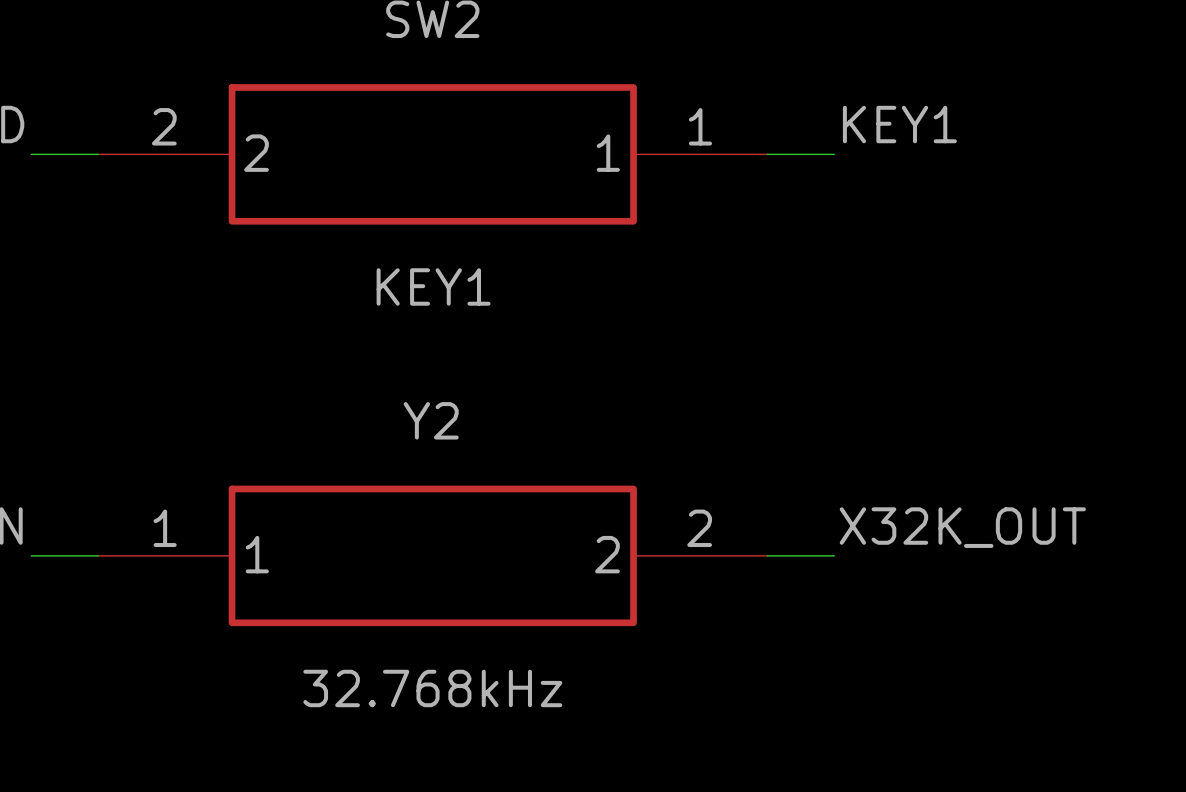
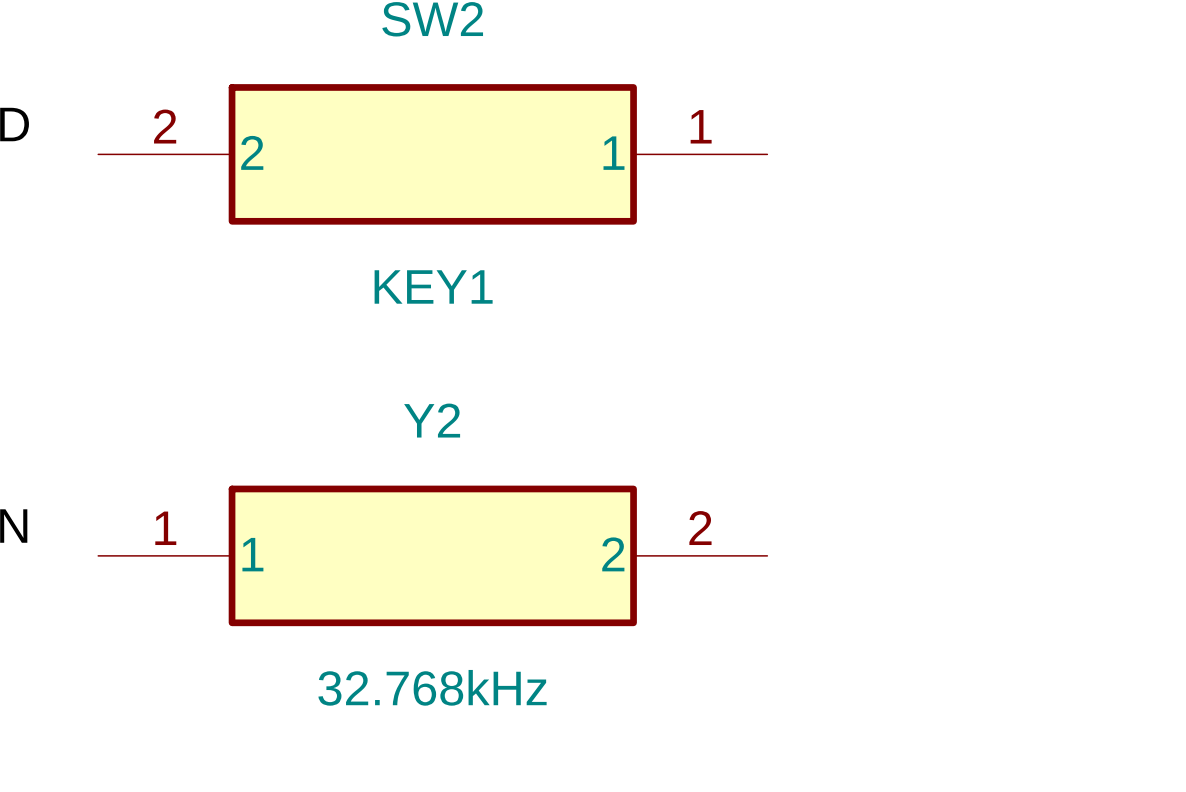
label: KEY1 (899, 124) -> none
wire: (31, 154) (98, 154) -> none
wire: (767, 154) (834, 154) -> none
label: X32K_OUT (962, 527) -> none
wire: (31, 555) (98, 555) -> none
wire: (767, 555) (834, 555) -> none

